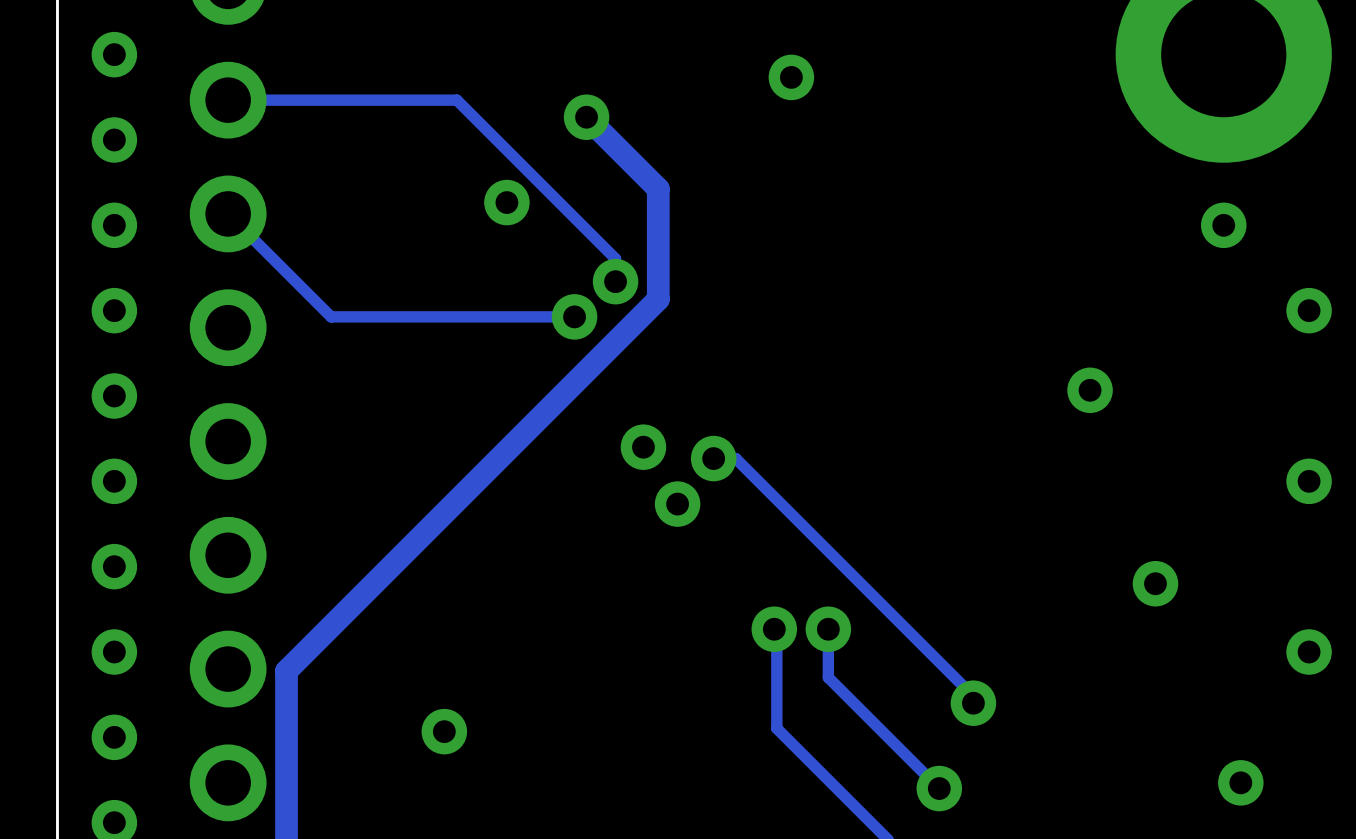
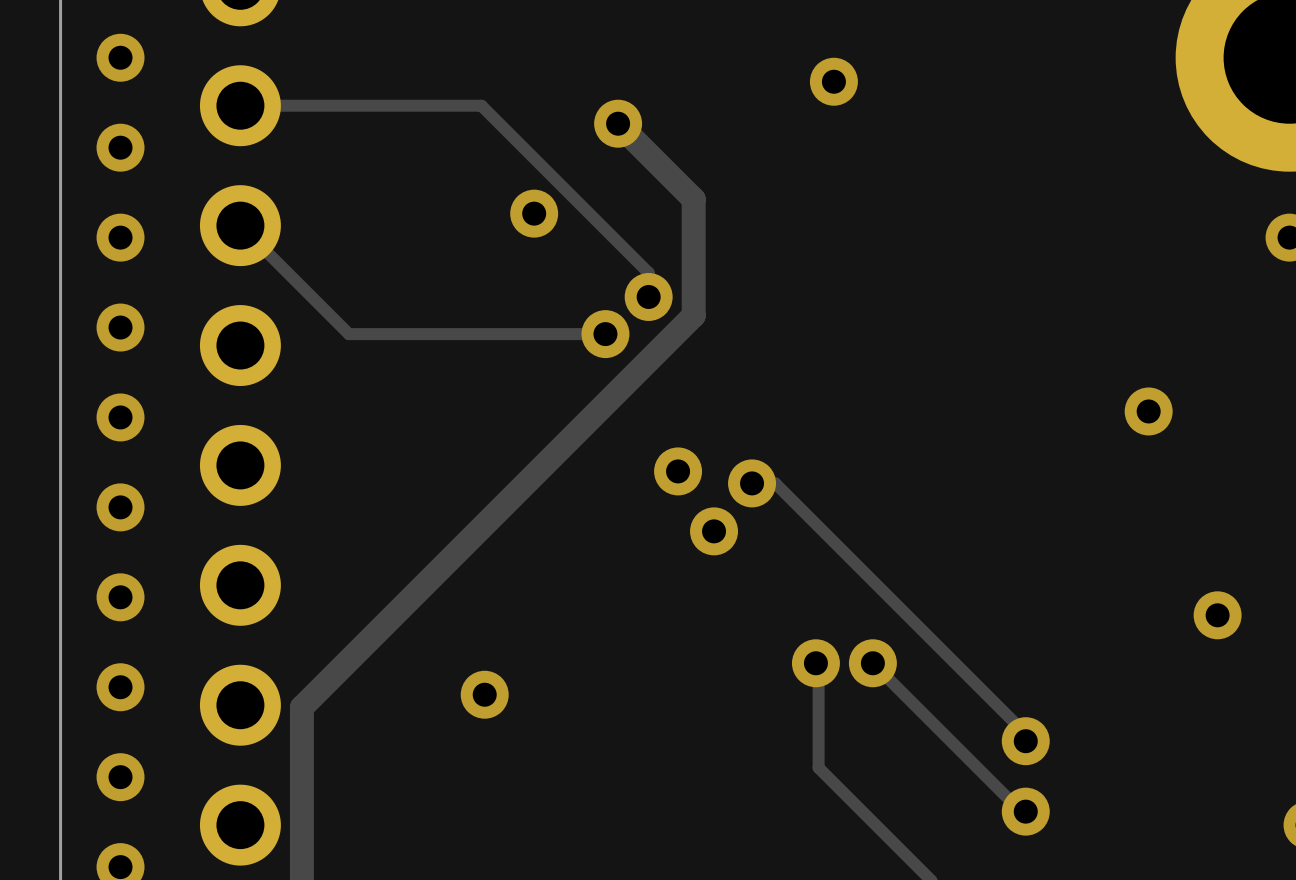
track: (828, 629) (828, 677) (939, 788) -> (872, 663) (1021, 811) (1025, 811)
via position: (444, 731) -> (484, 694)
via position: (939, 788) -> (1025, 811)

